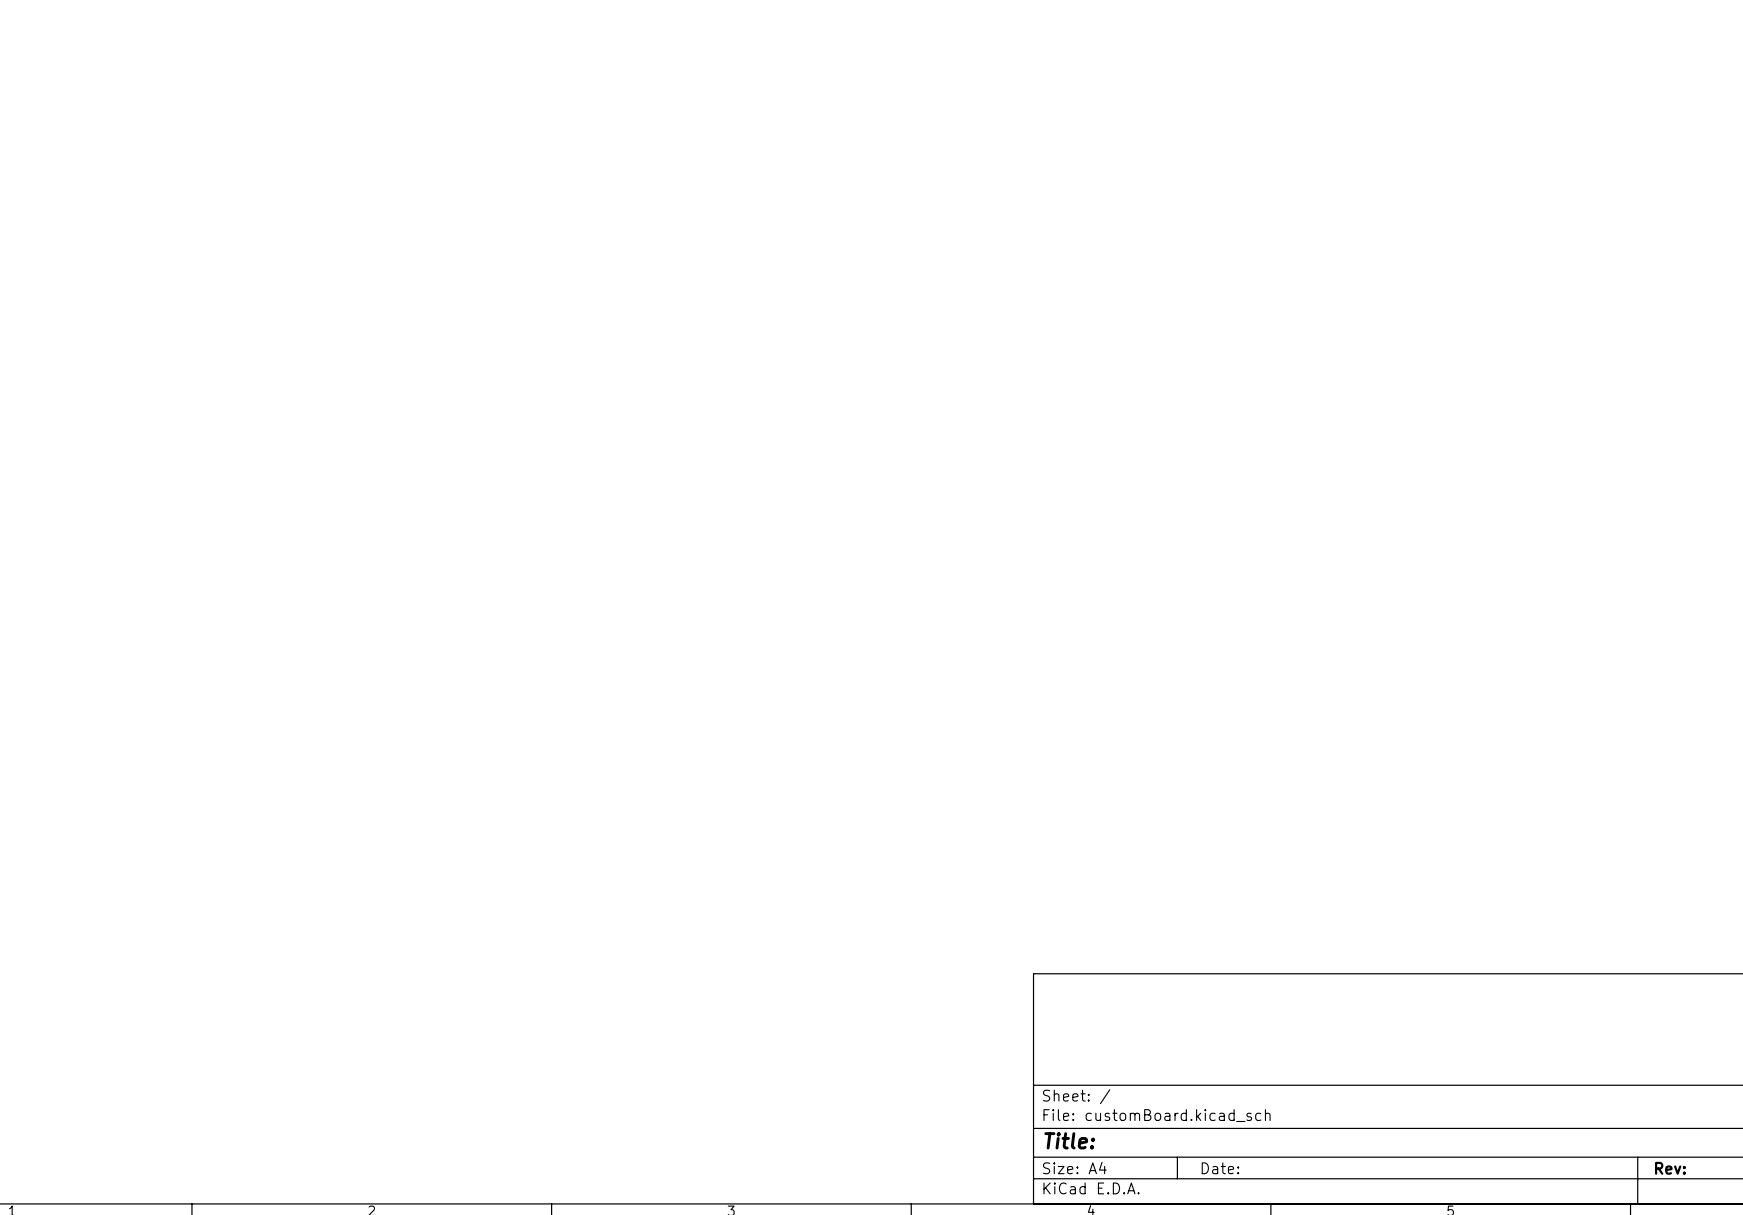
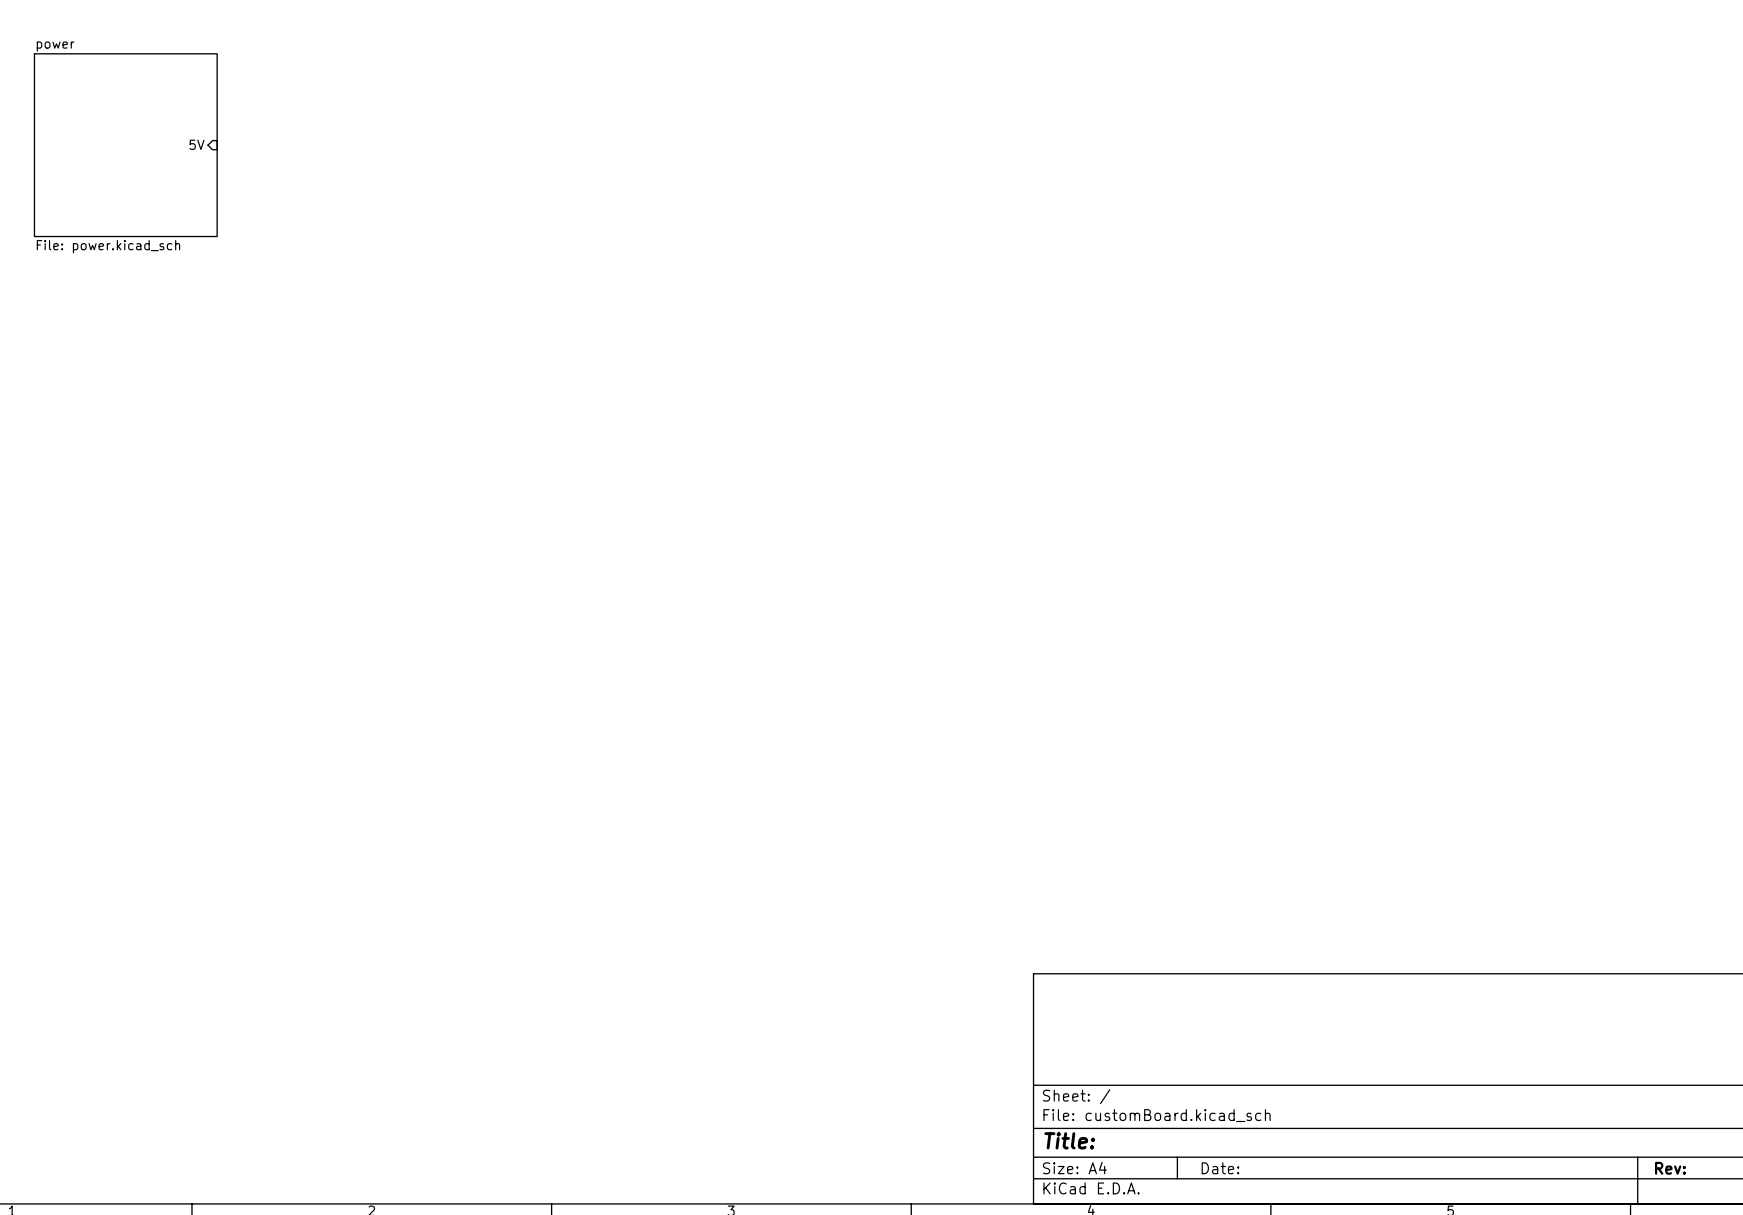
sheet pin: none -> 5V (196, 144)
sheet power: none -> File: power.kicad_sch (125, 145)

